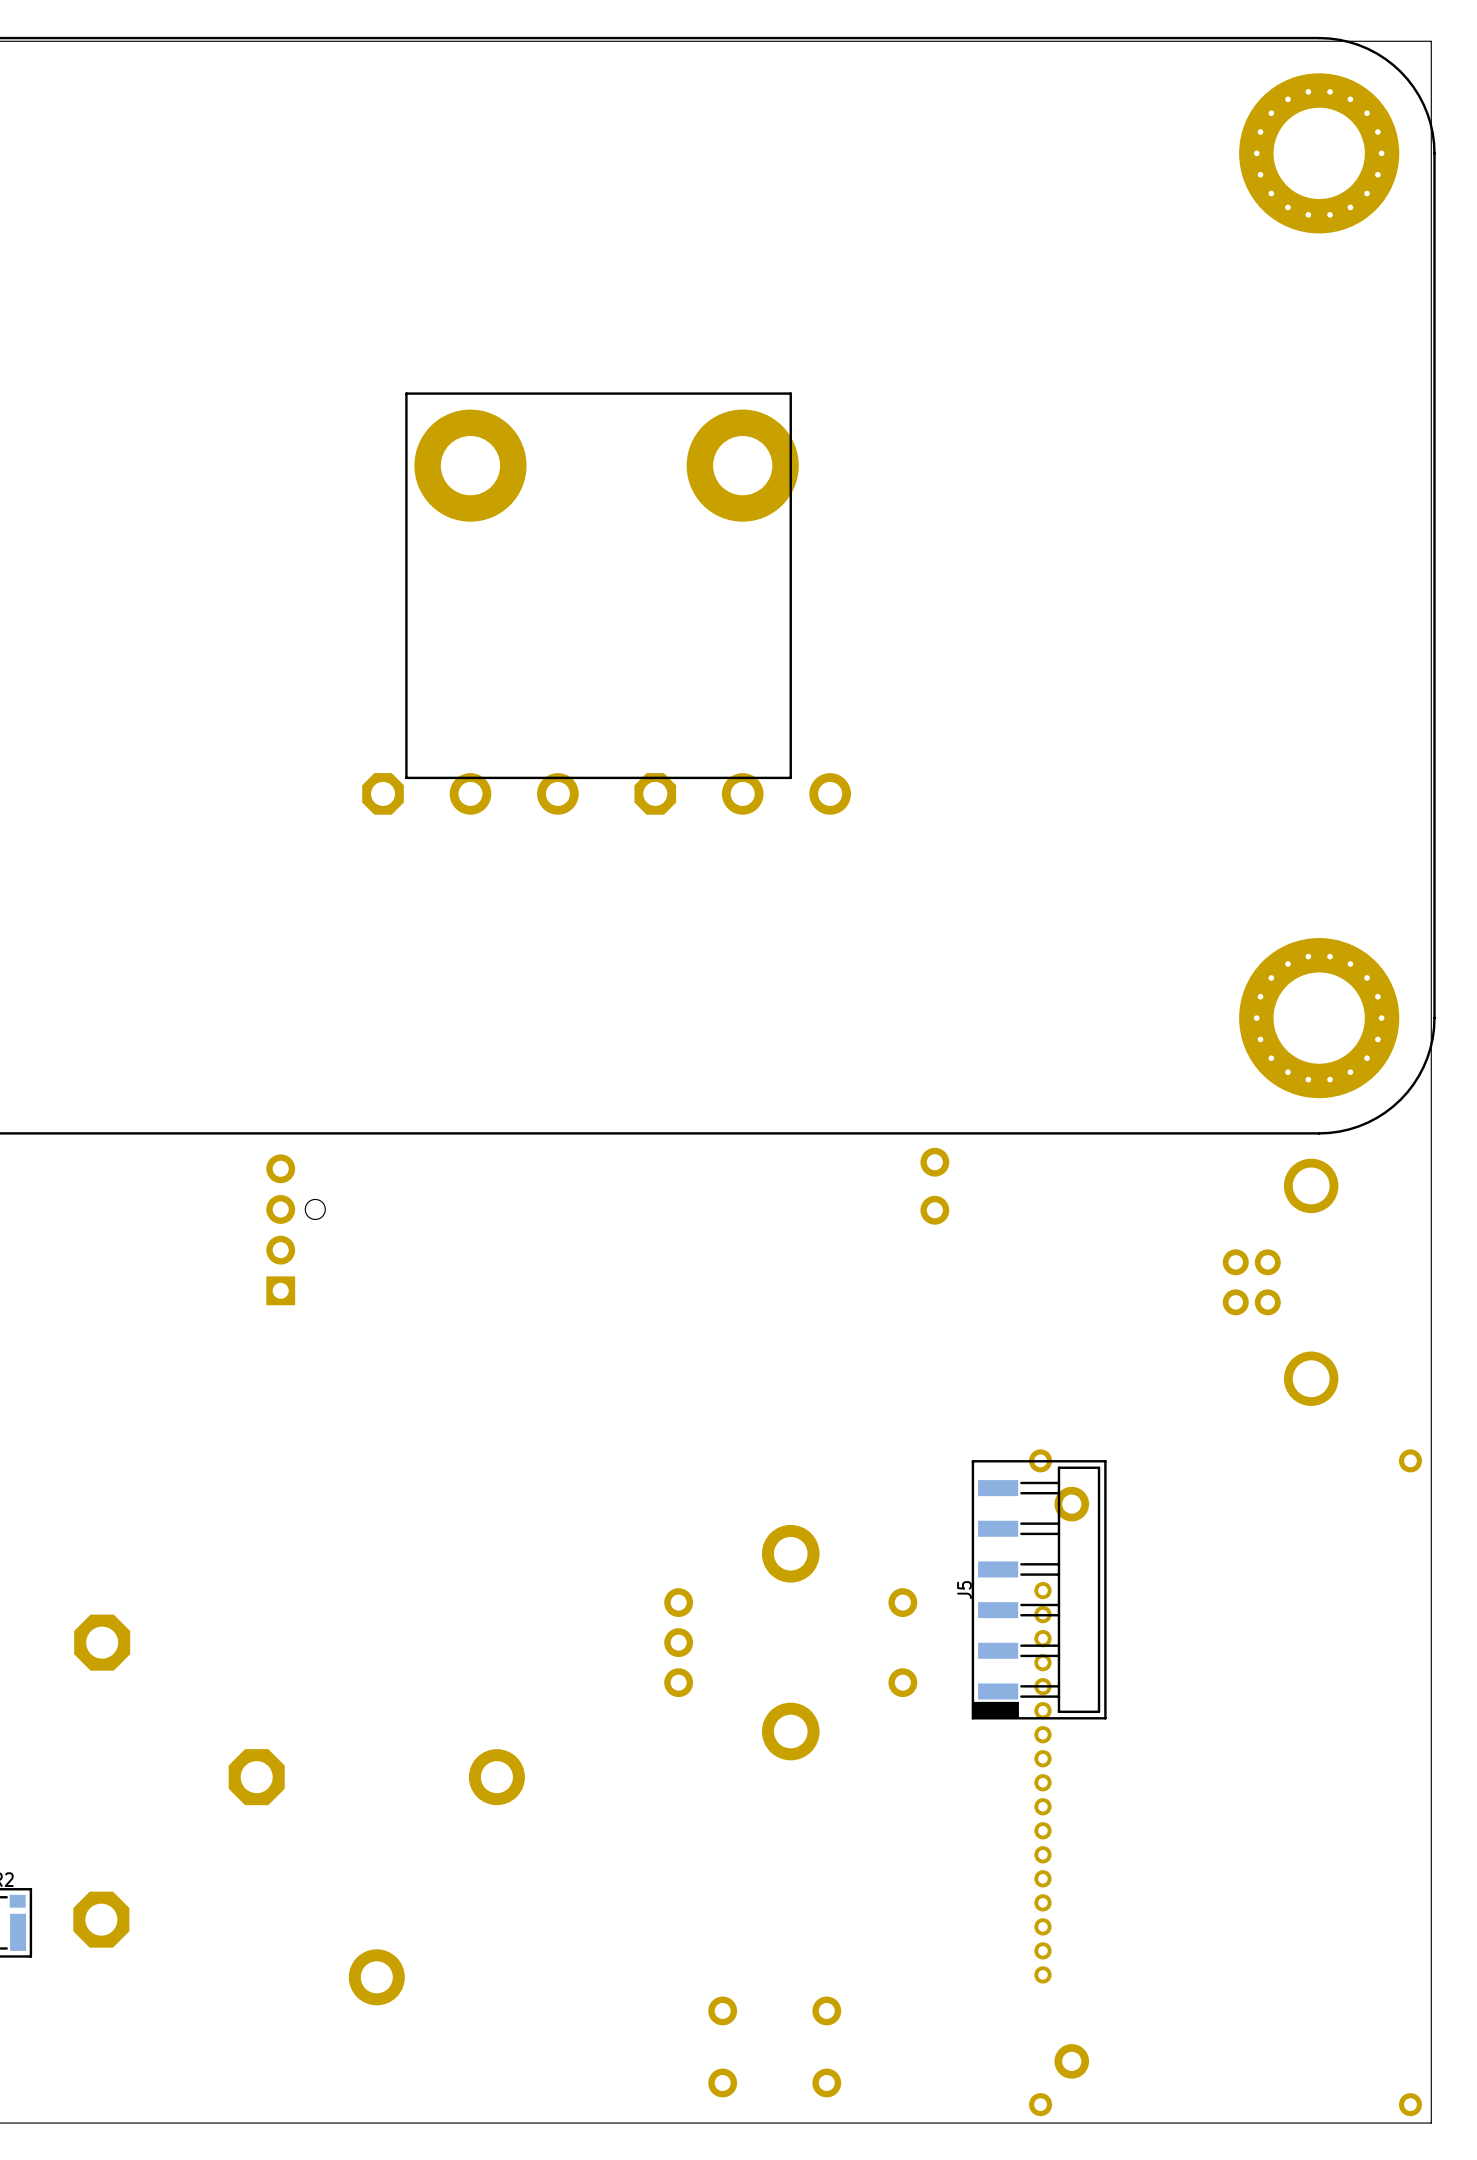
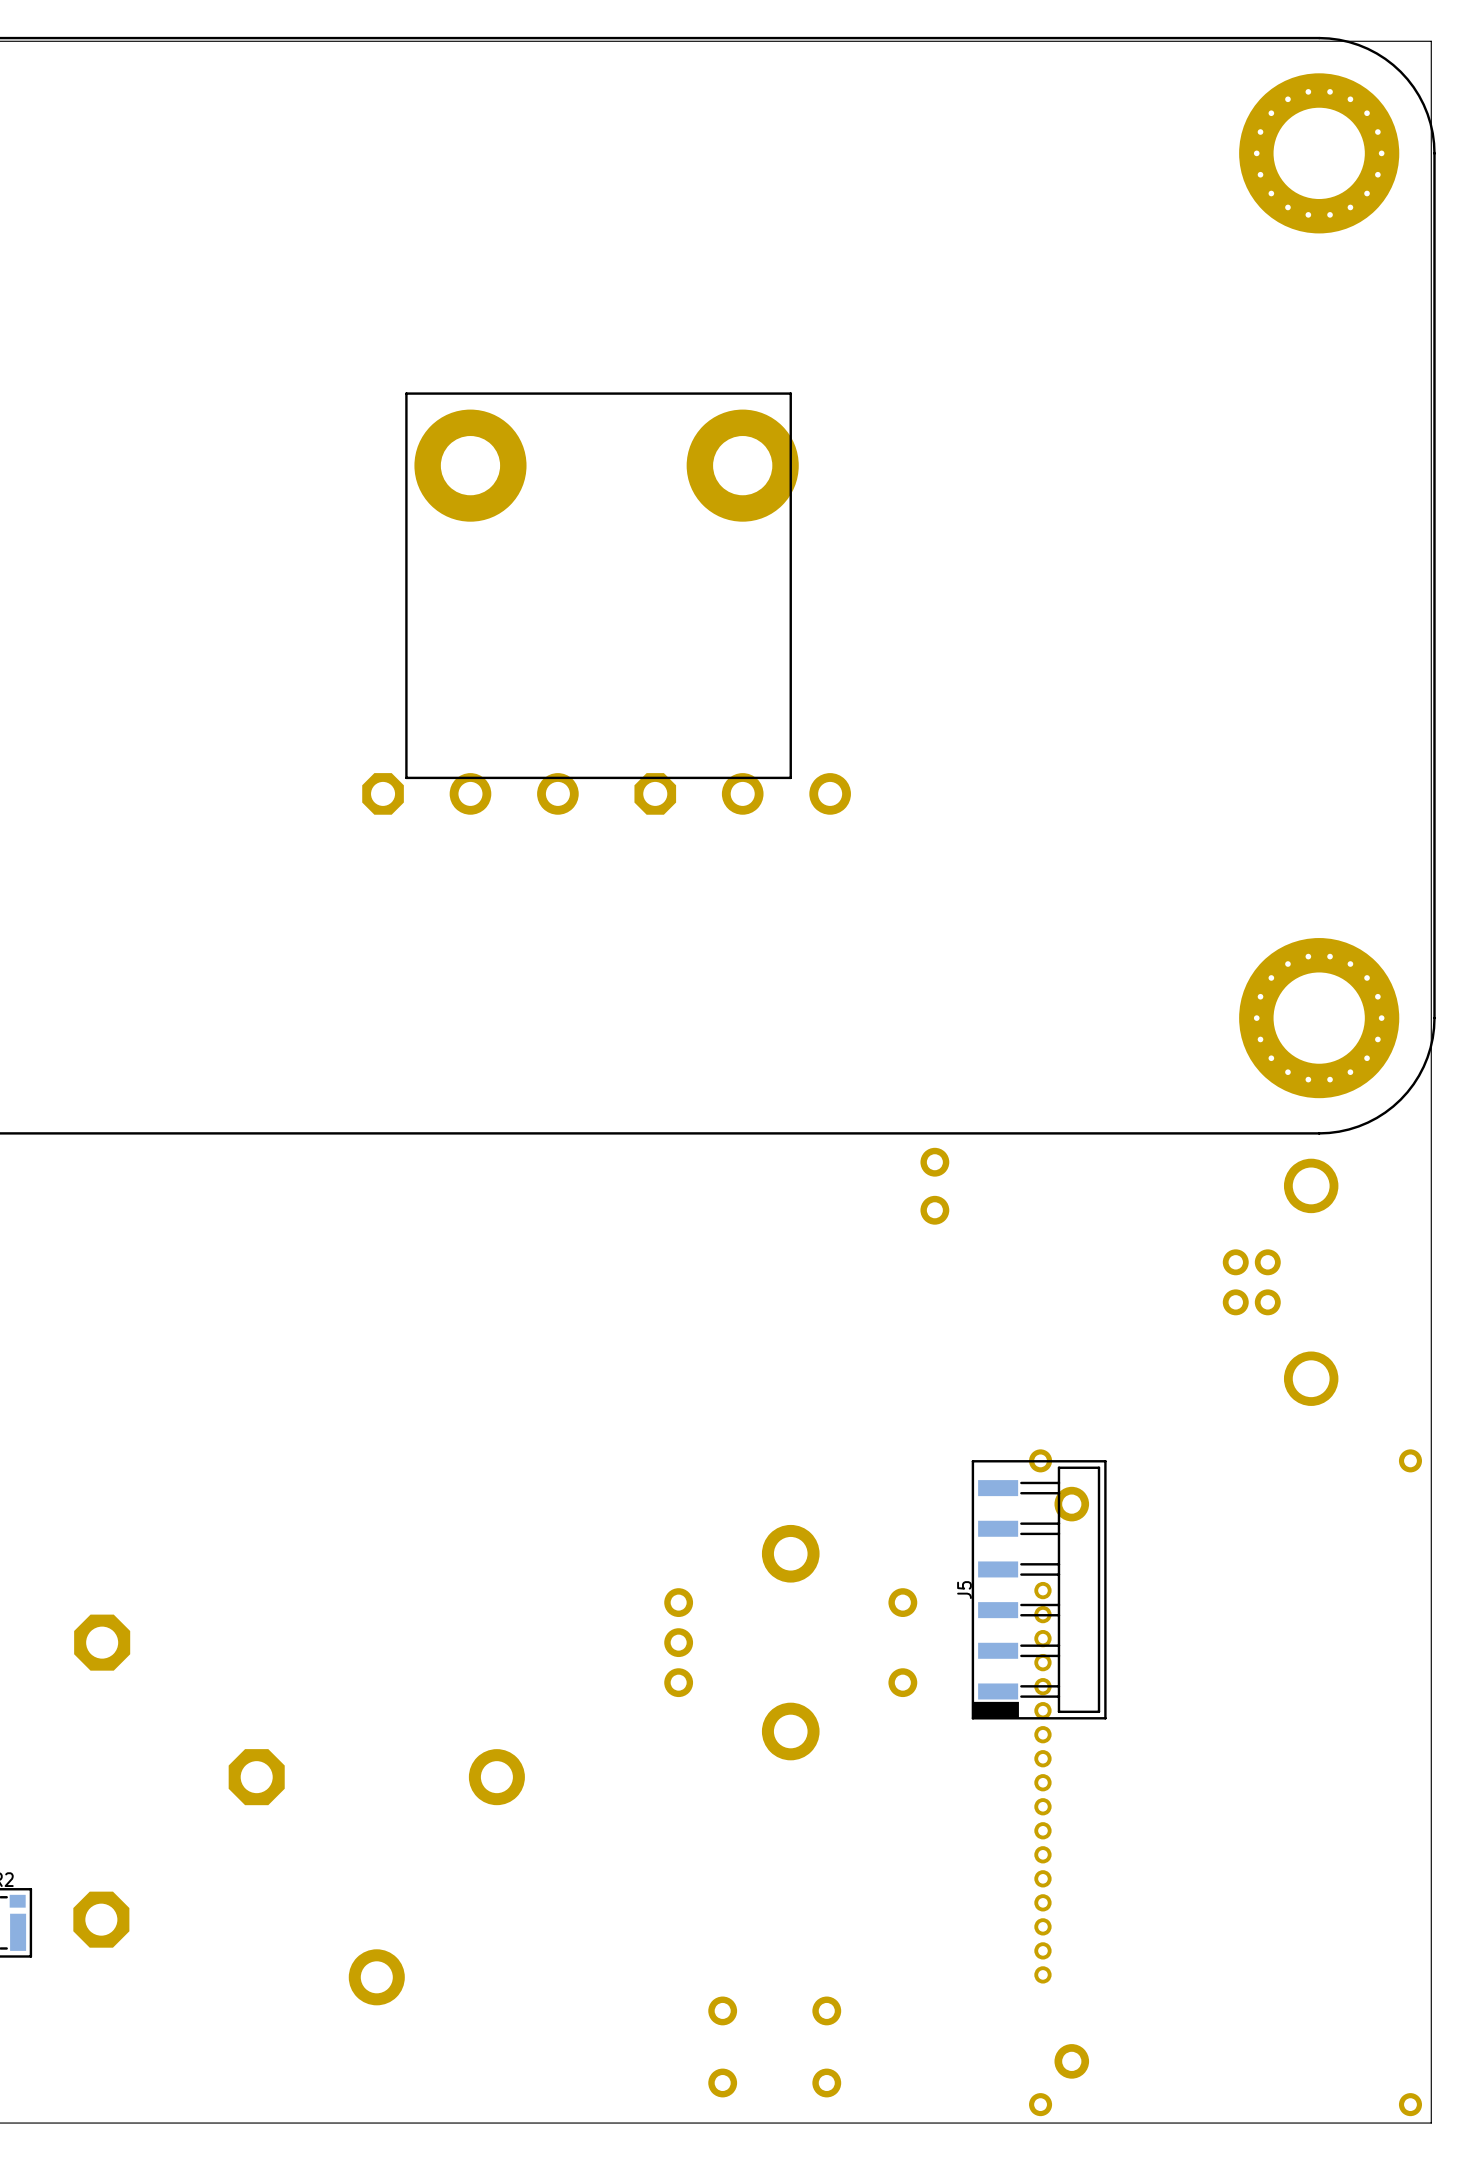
part: (295, 1229) -> none

